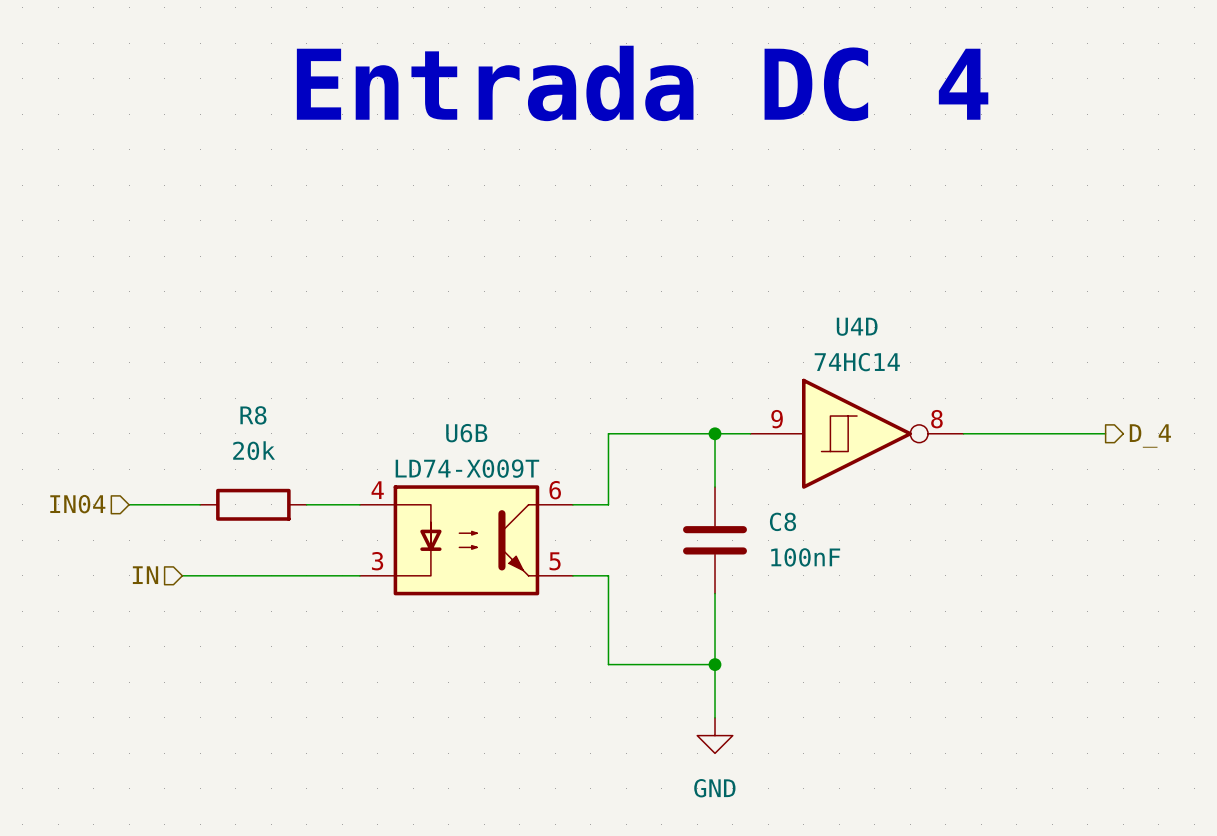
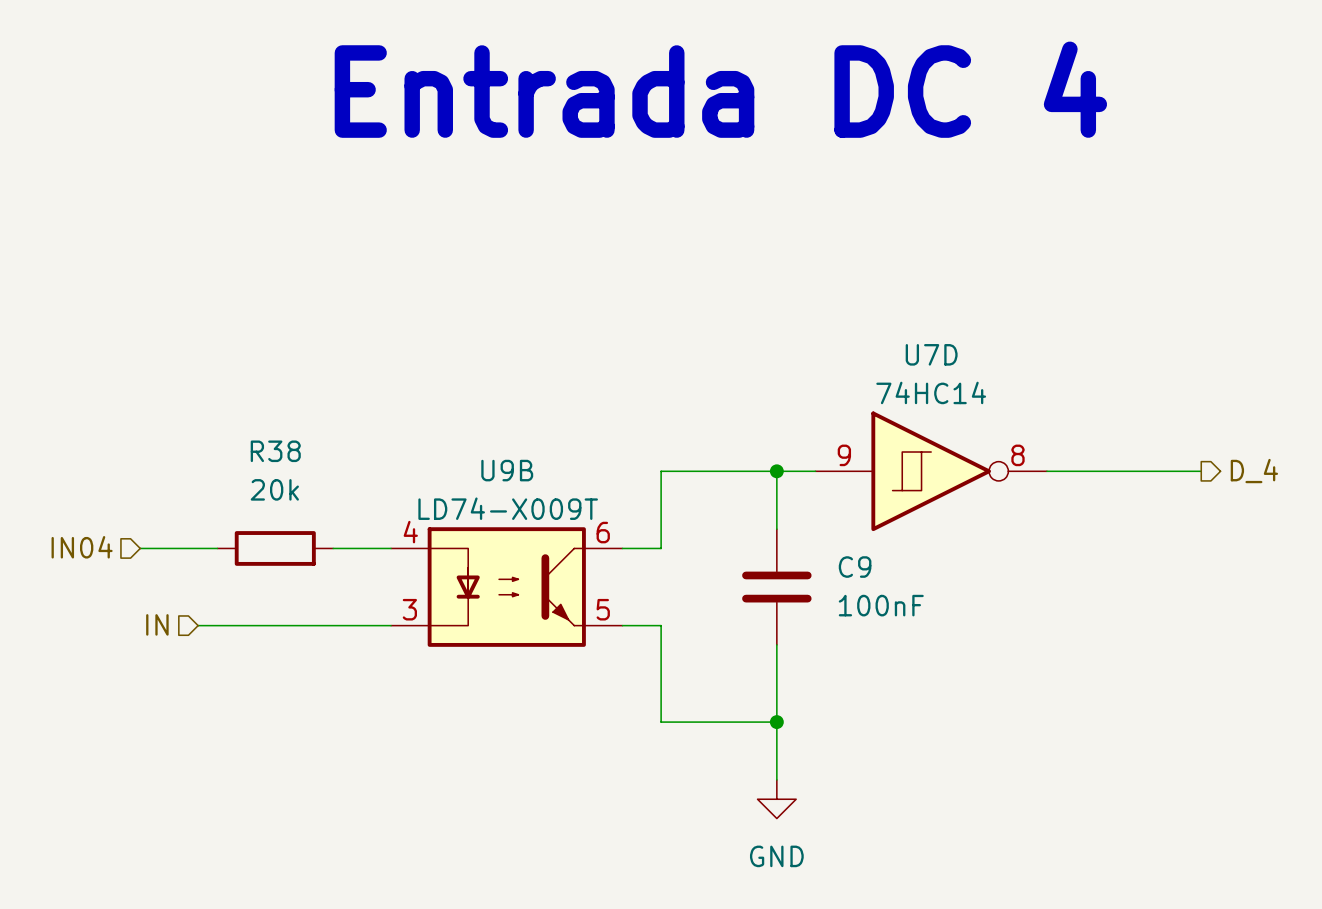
U4D name: U4D (857, 326) -> U7D (931, 354)
R8 name: R8 (253, 415) -> R38 (275, 451)
U6B name: U6B (466, 433) -> U9B (507, 470)
C8 name: C8 (782, 521) -> C9 (855, 567)

